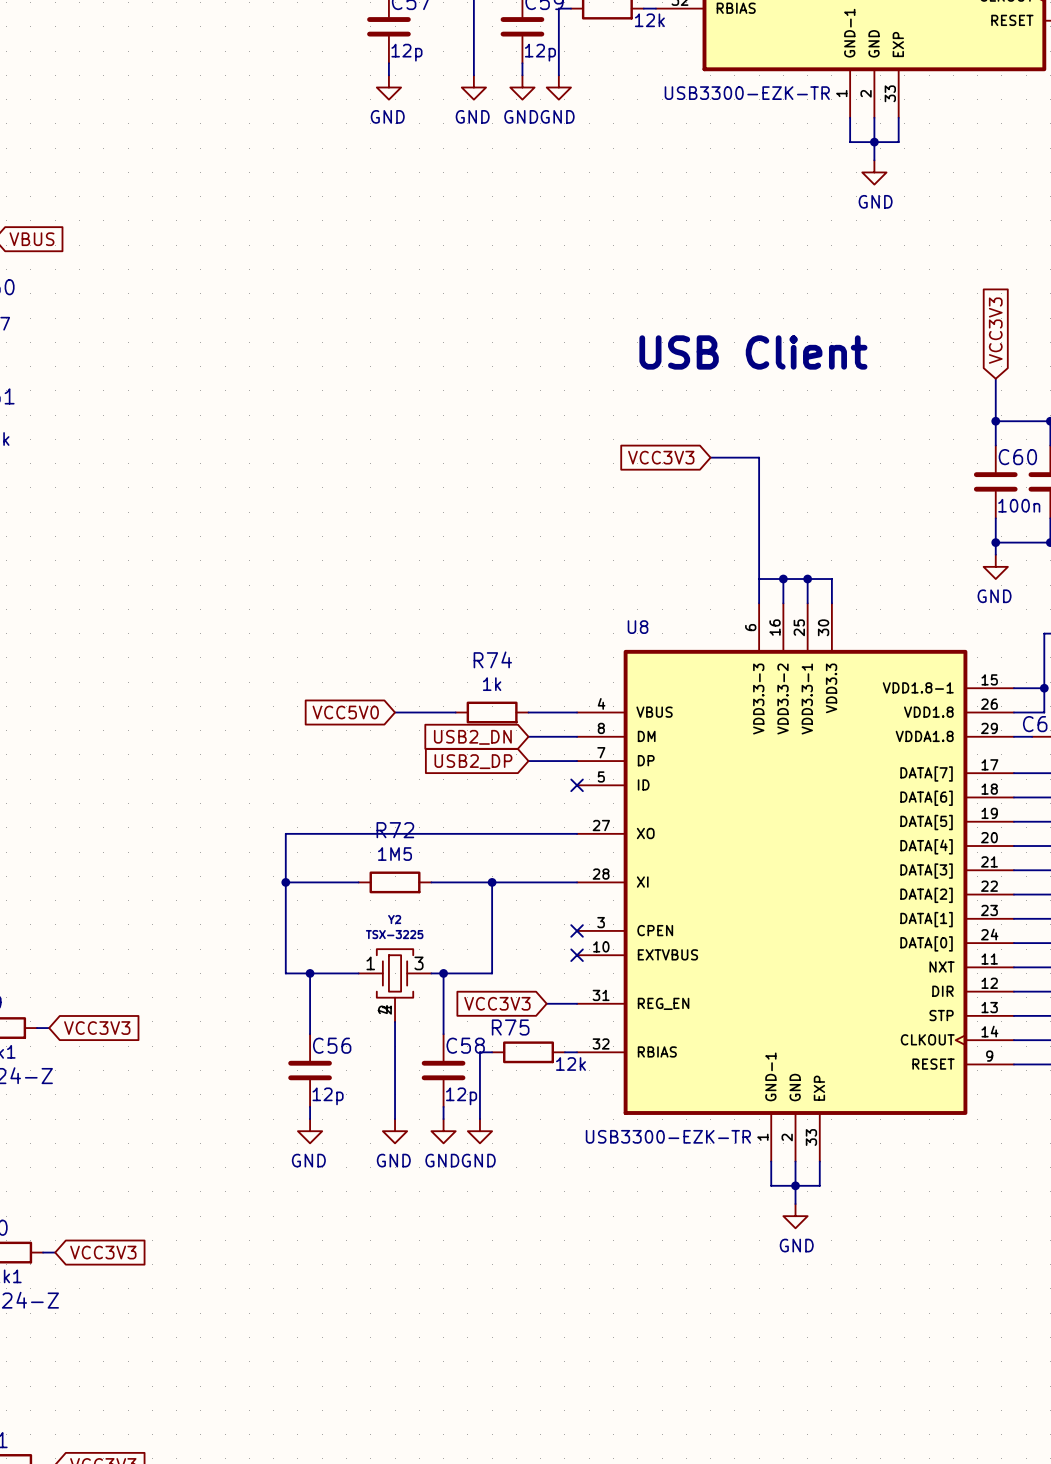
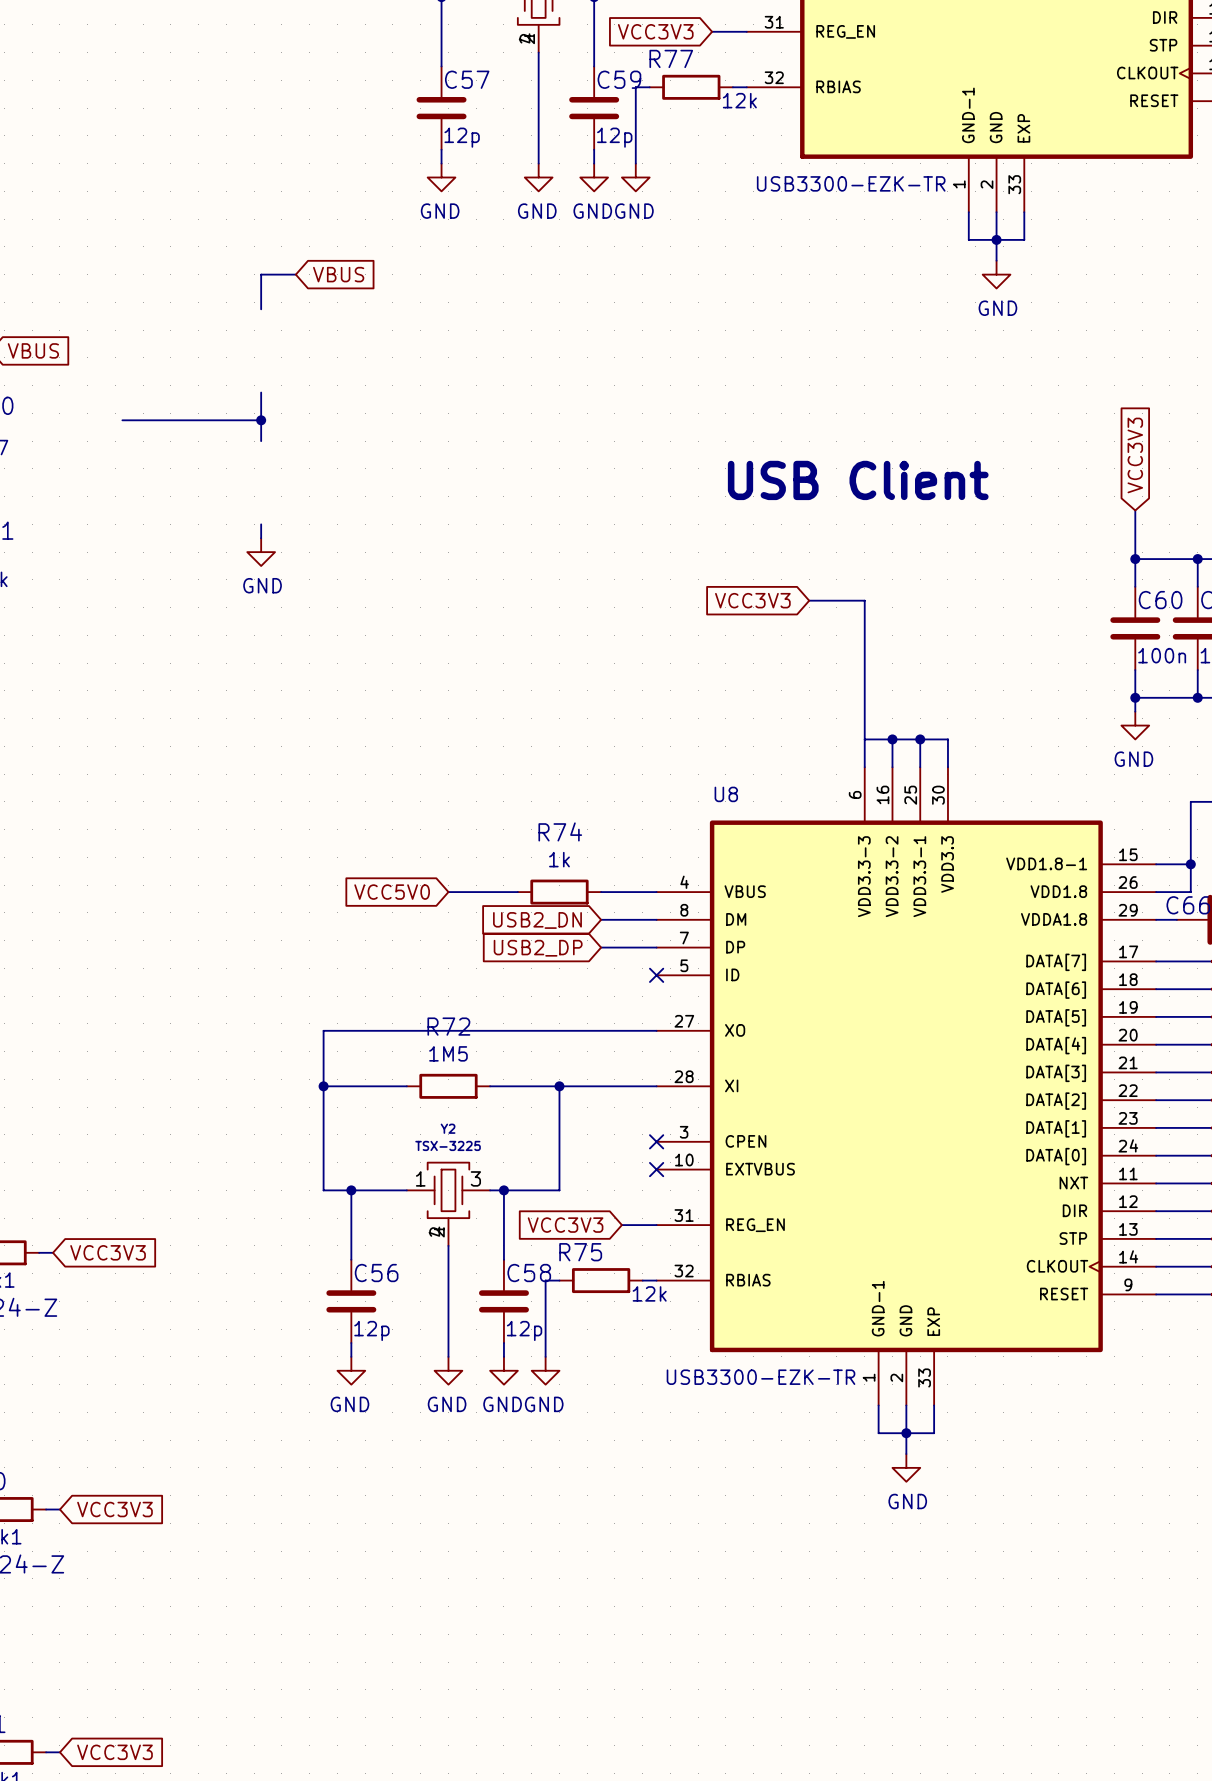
wire: none -> (295, 274) (261, 274) (261, 309)
global label: none -> VBUS (338, 274)
wire: none -> (261, 392) (261, 441)
wire: none -> (122, 420) (261, 420)
junction: none -> (261, 420)
wire: none -> (261, 524) (261, 538)
power symbol: none -> GND (261, 552)

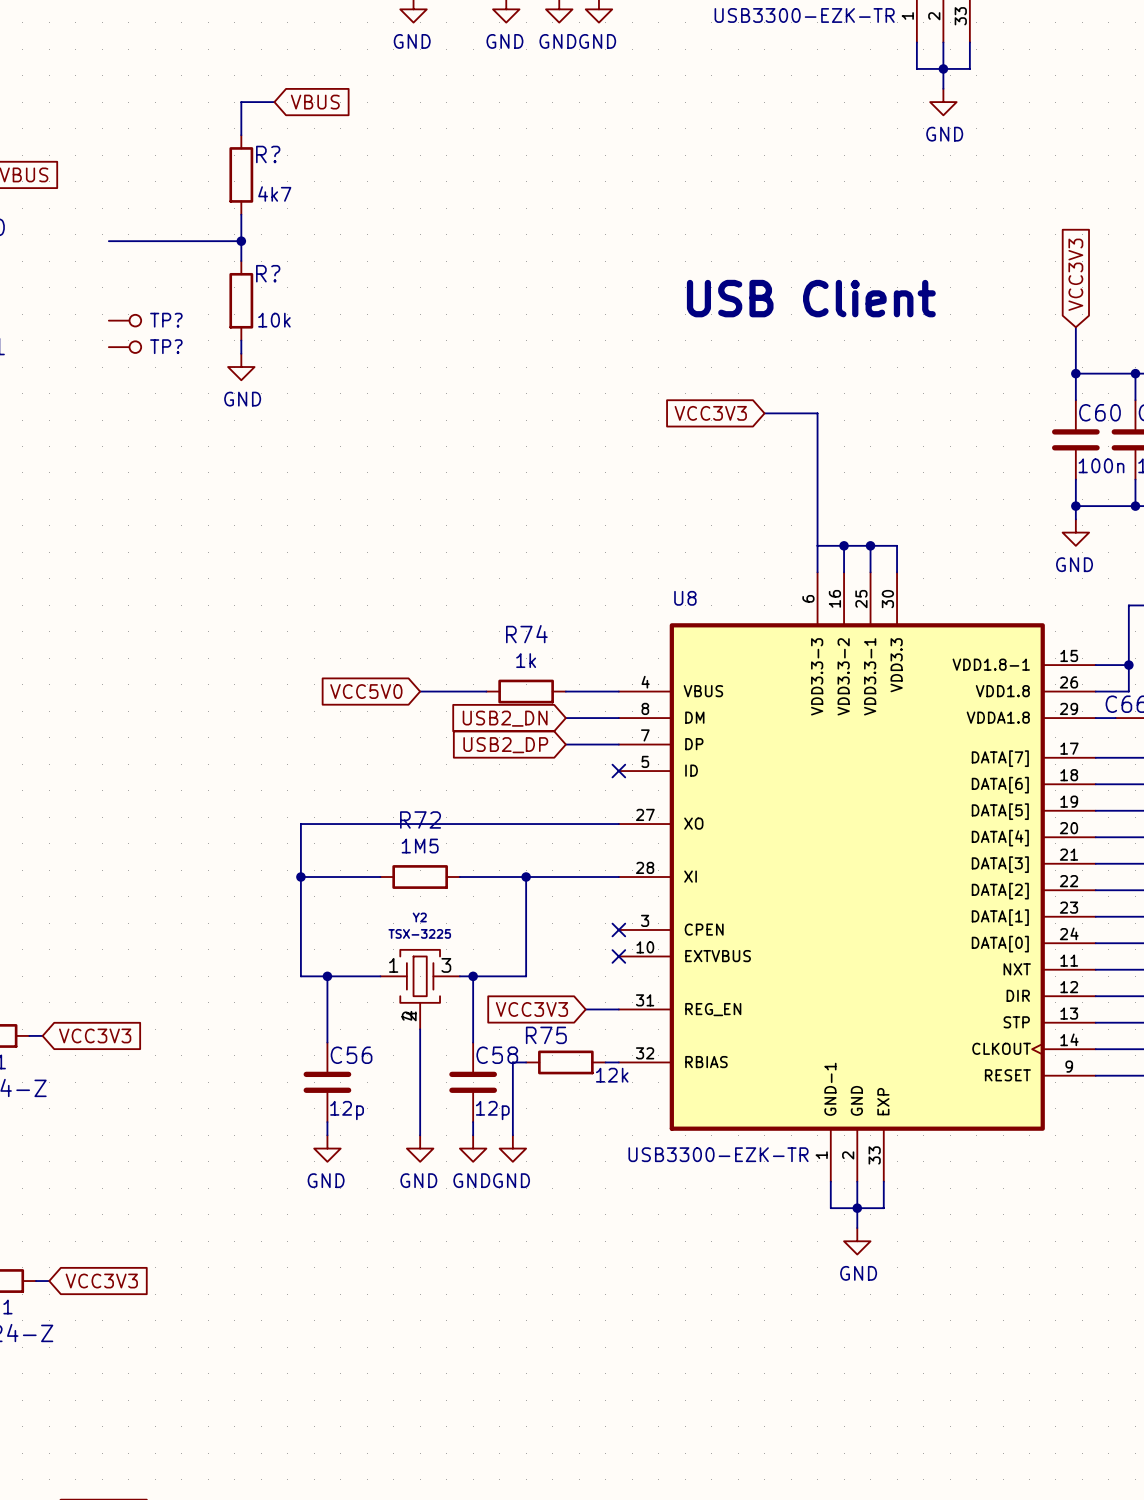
R?: none -> (241, 174)
R?: none -> (241, 300)
TP?: none -> (125, 320)
TP?: none -> (125, 347)

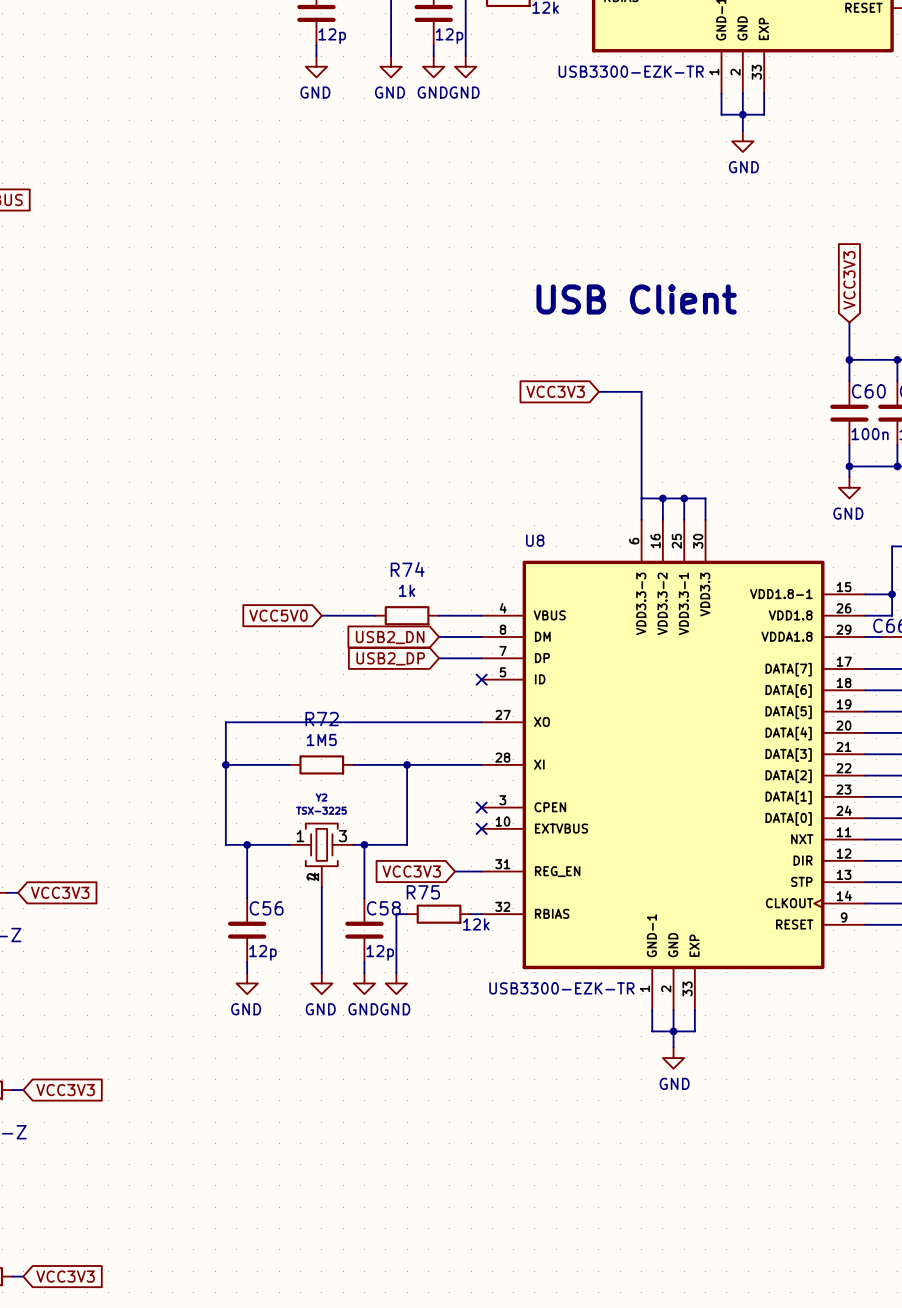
wire: (274, 102) (241, 102) (241, 135) -> none
global label: VBUS (315, 102) -> none
R?: (241, 174) -> none
wire: (241, 214) (241, 261) -> none
wire: (108, 241) (241, 241) -> none
junction: (241, 241) -> none
R?: (241, 300) -> none
TP?: (125, 320) -> none
wire: (241, 340) (241, 353) -> none
TP?: (125, 347) -> none
power symbol: GND (241, 367) -> none

